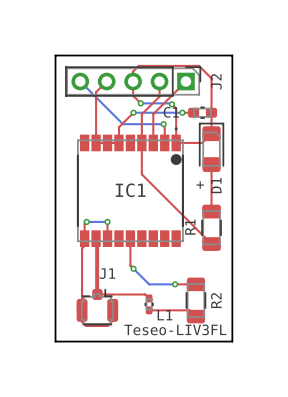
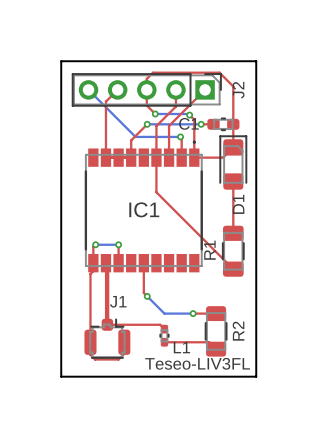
drawing: [170, 154, 182, 165] -> none
text: + (200, 185) -> none

